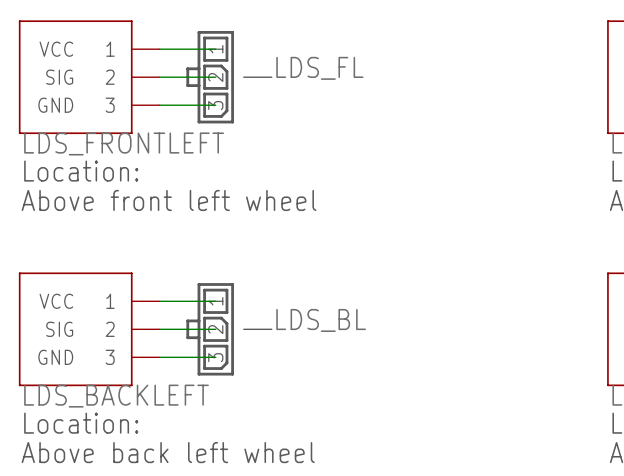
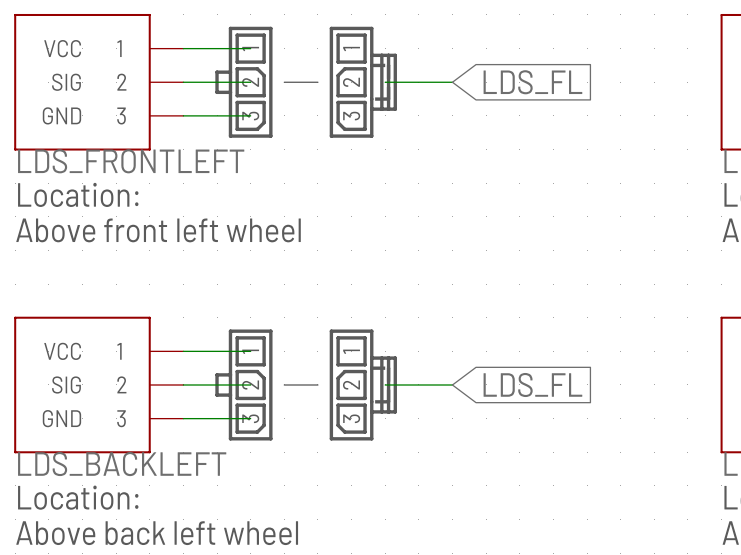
label: LDS_FL (319, 68) -> none
part: none -> (363, 82)
wire: none -> (385, 82) (452, 82)
global label: none -> LDS_FL (532, 82)
label: LDS_BL (321, 320) -> none
part: none -> (363, 384)
wire: none -> (385, 384) (452, 384)
global label: none -> LDS_FL (532, 384)

